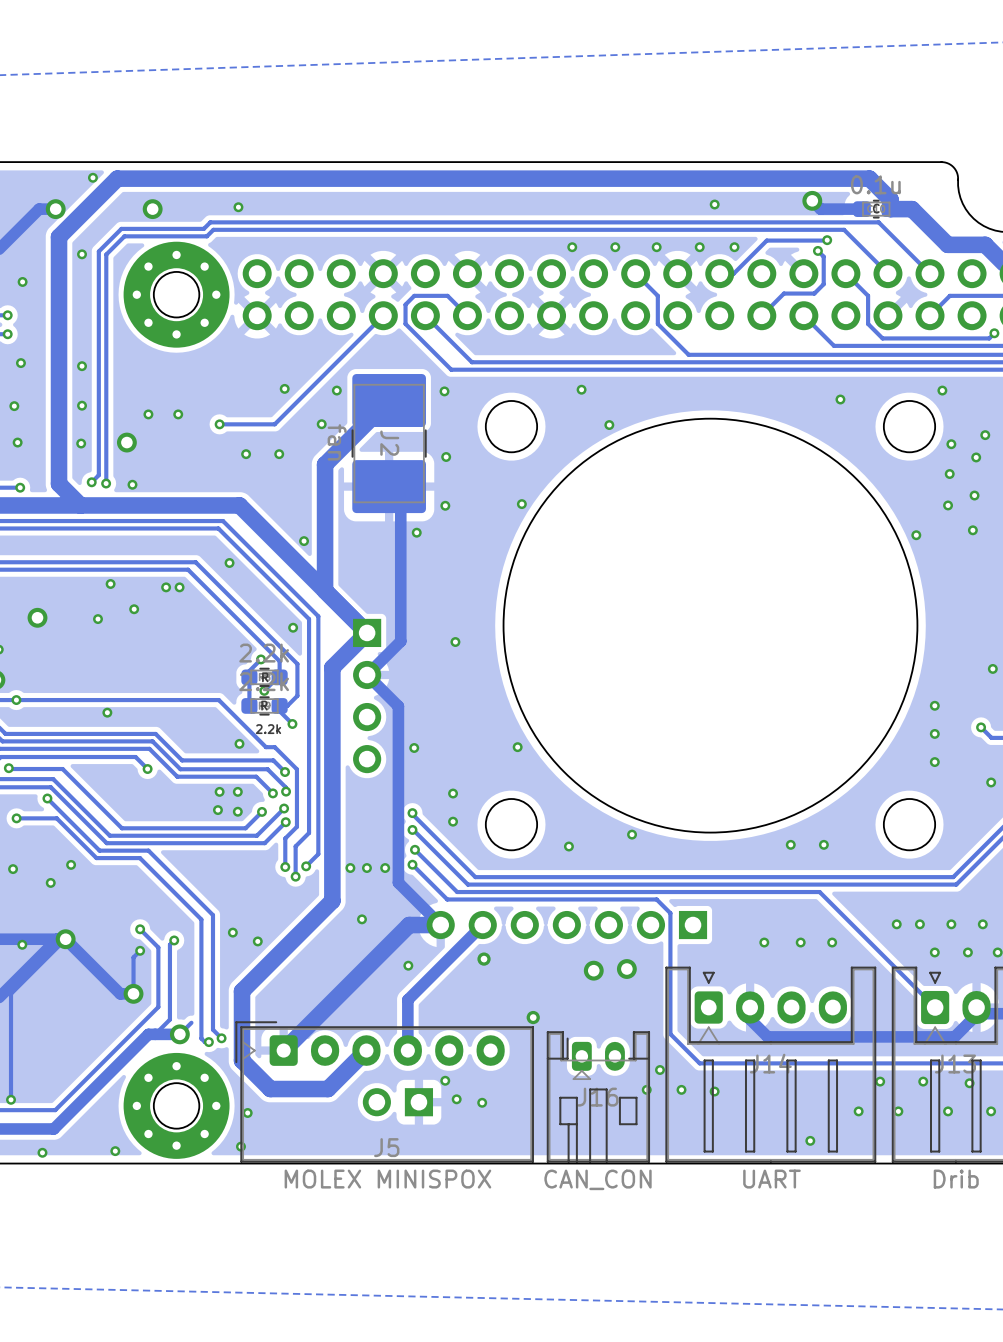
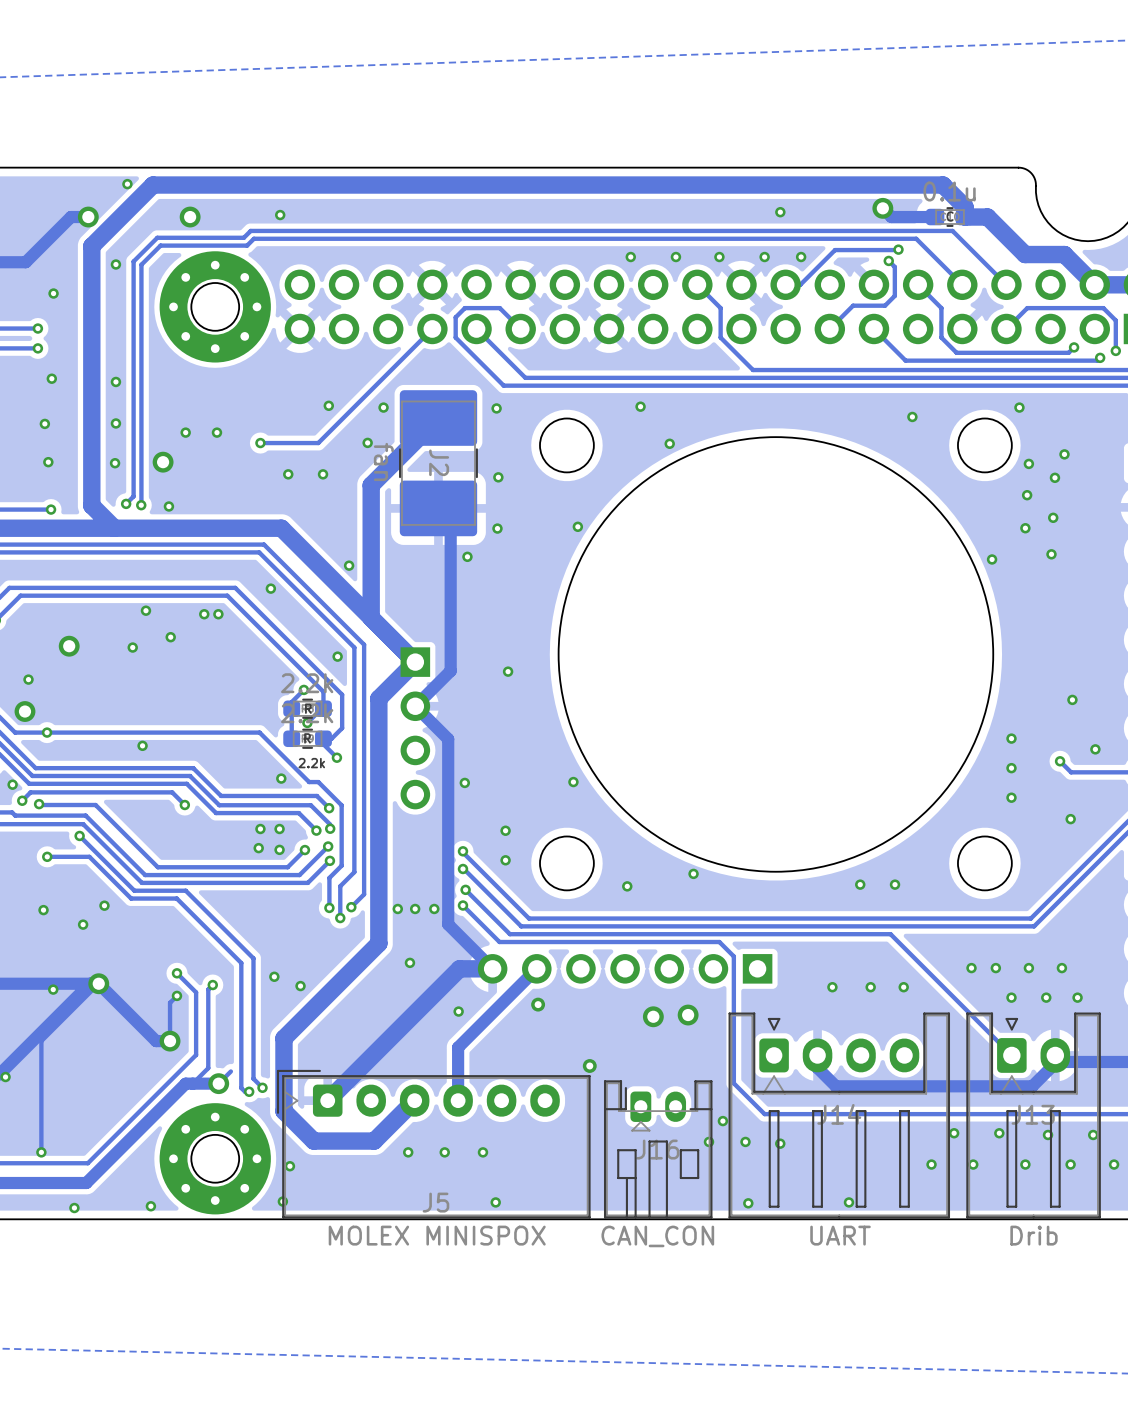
via: (445, 1080) -> none
via: none -> (408, 1152)
via: none -> (444, 1152)
via: none -> (482, 1152)
via: (456, 1099) -> none
part: (397, 1102) -> none
via: (482, 1102) -> none
via position: (810, 1140) -> (848, 1202)
via: none -> (495, 1202)
via: none -> (748, 1203)

